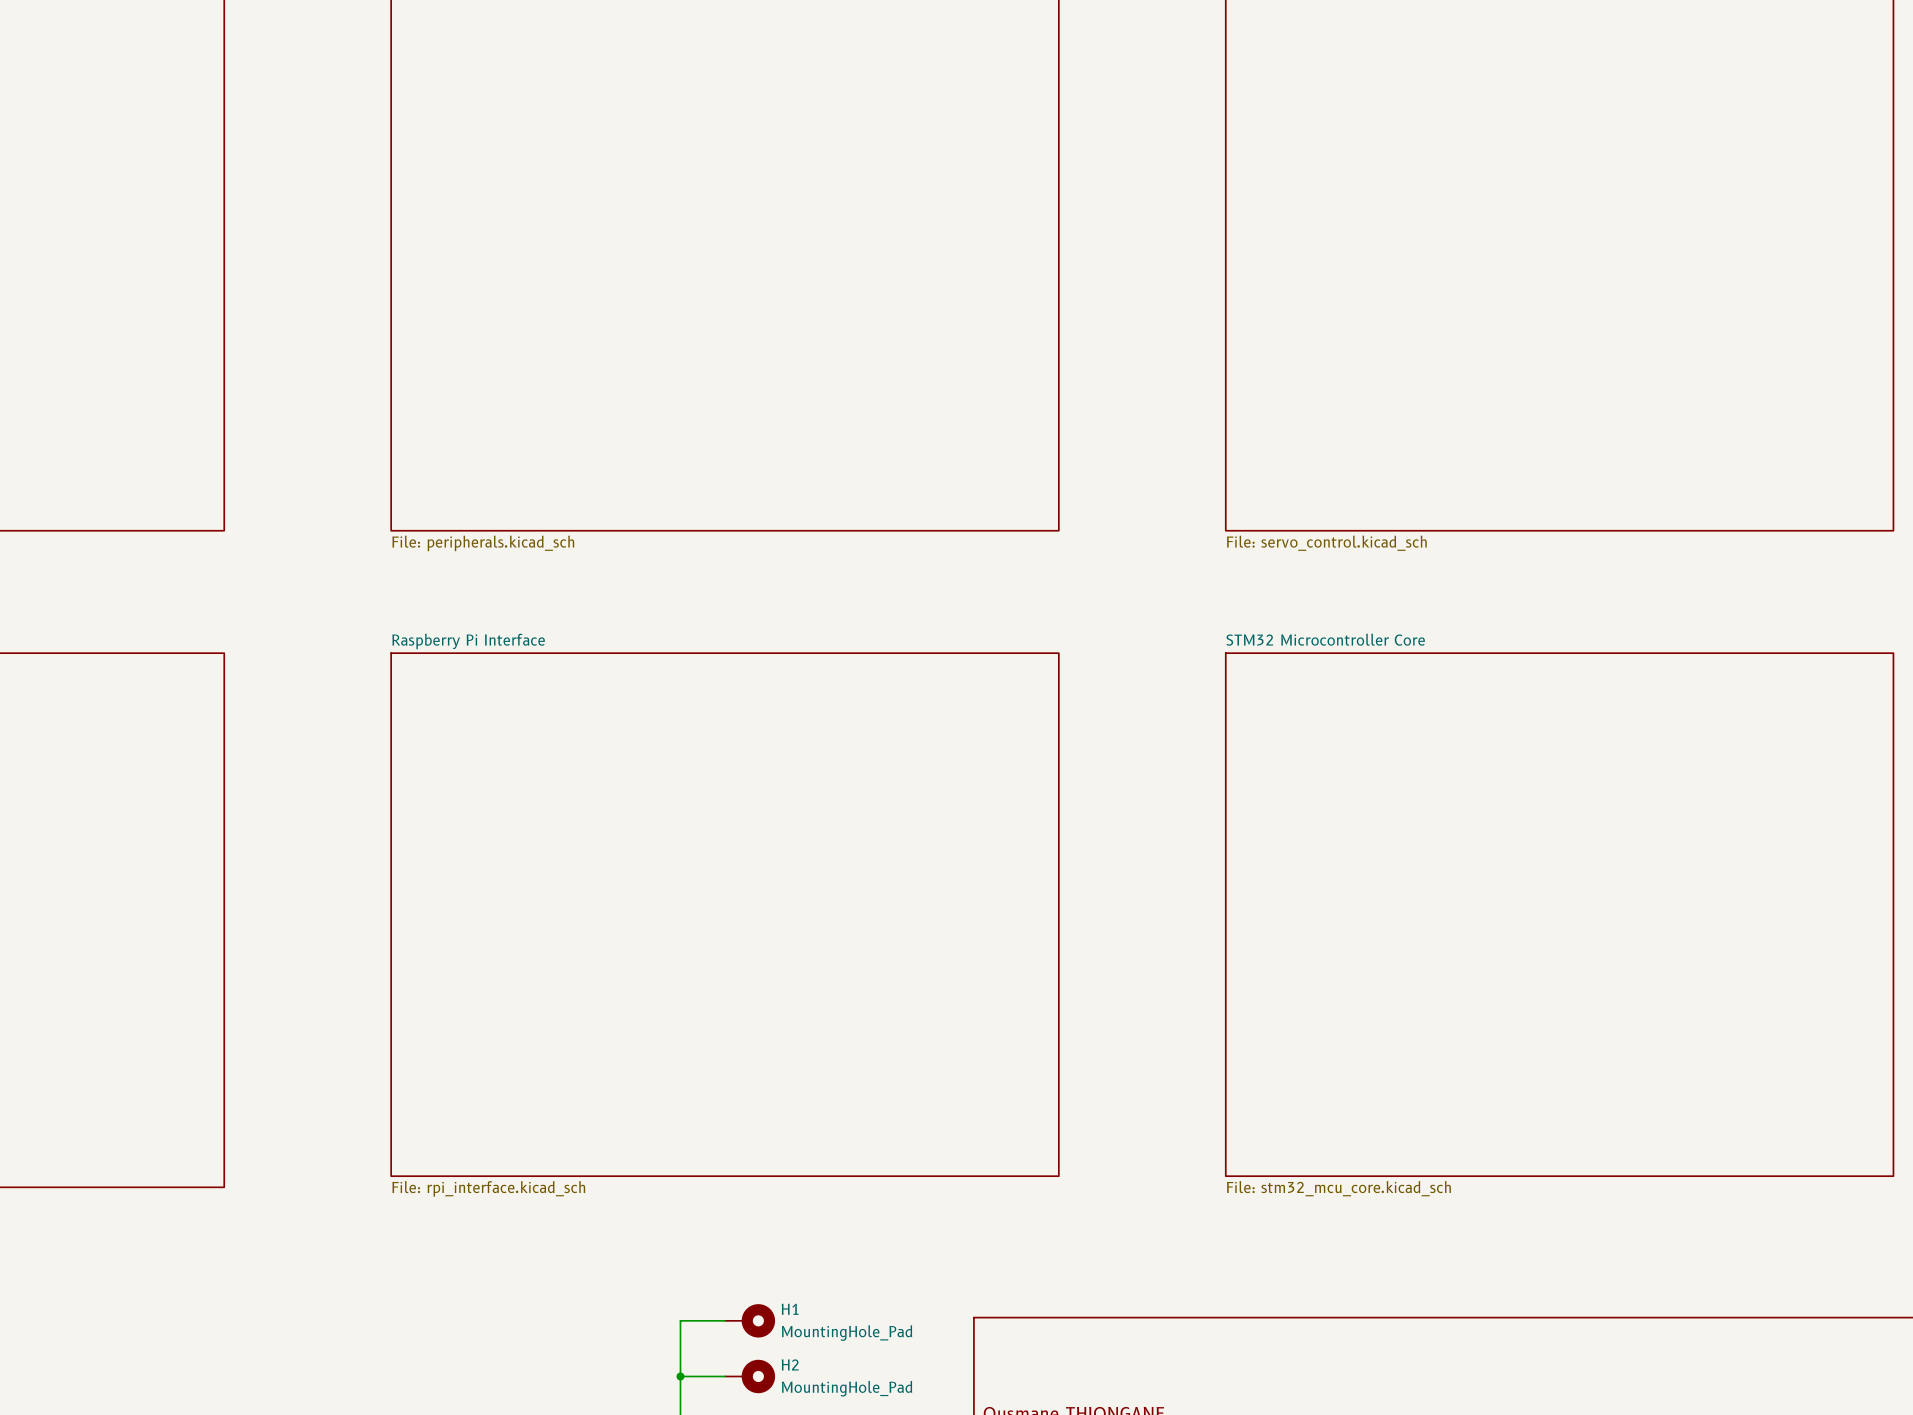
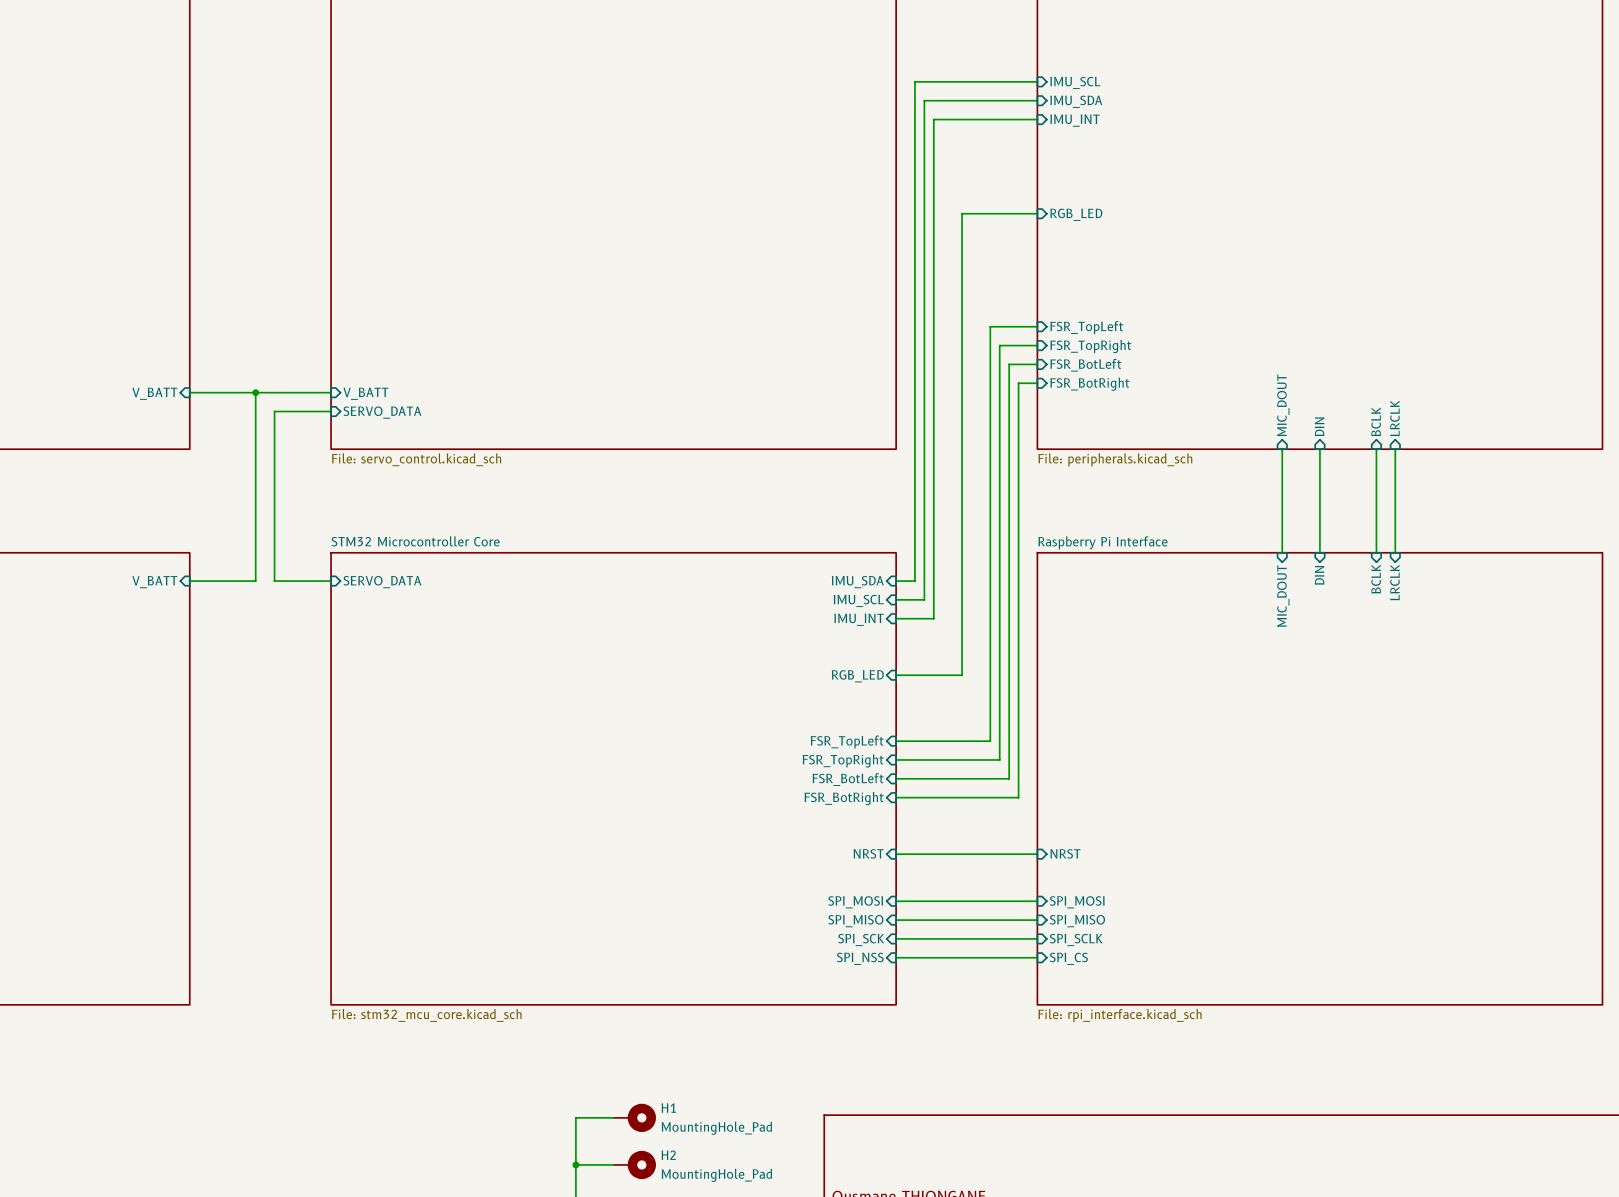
wire: none -> (1037, 81) (914, 81) (914, 581) (896, 581)
sheet pin: none -> IMU_SCL (1075, 82)
wire: none -> (1037, 100) (924, 100) (924, 599) (896, 599)
sheet pin: none -> IMU_SDA (1076, 101)
wire: none -> (1037, 119) (933, 119) (933, 618) (896, 618)
sheet pin: none -> IMU_INT (1074, 120)
wire: none -> (1037, 213) (962, 213) (962, 675) (896, 675)
sheet pin: none -> RGB_LED (1076, 214)
wire: none -> (1037, 326) (990, 326) (990, 741) (896, 741)
sheet pin: none -> FSR_TopLeft (1086, 327)
wire: none -> (1037, 345) (999, 345) (999, 759) (896, 759)
sheet pin: none -> FSR_TopRight (1090, 346)
wire: none -> (1037, 364) (1009, 364) (1009, 778) (896, 778)
sheet pin: none -> FSR_BotLeft (1085, 365)
wire: none -> (1037, 383) (1018, 383) (1018, 797) (896, 797)
sheet pin: none -> FSR_BotRight (1089, 384)
wire: none -> (189, 392) (331, 392)
wire: none -> (255, 392) (255, 581) (189, 581)
junction: none -> (255, 392)
sheet pin: none -> V_BATT (154, 393)
sheet pin: none -> V_BATT (365, 393)
sheet pin: none -> MIC_DOUT (1283, 405)
wire: none -> (331, 411) (274, 411) (274, 581) (331, 581)
sheet pin: none -> SERVO_DATA (382, 412)
sheet pin: none -> LRCLK (1394, 418)
sheet pin: none -> BCLK (1376, 421)
sheet pin: none -> DIN (1319, 426)
wire: none -> (1282, 449) (1282, 552)
wire: none -> (1319, 449) (1319, 552)
wire: none -> (1376, 449) (1376, 552)
wire: none -> (1395, 449) (1395, 552)
sheet value: File: peripherals.kicad_sch (483, 543) -> File: servo_control.kicad_sch (416, 459)
sheet value: File: servo_control.kicad_sch (1326, 543) -> File: peripherals.kicad_sch (1115, 459)
sheet STM32 Microcontroller Core shape: [1225, 652, 1895, 1177] -> [330, 552, 897, 1006]
sheet pin: none -> DIN (1319, 575)
sheet pin: none -> BCLK (1376, 579)
sheet pin: none -> V_BATT (154, 582)
sheet pin: none -> SERVO_DATA (382, 582)
sheet pin: none -> IMU_SDA (857, 582)
sheet pin: none -> LRCLK (1394, 582)
sheet pin: none -> MIC_DOUT (1283, 596)
sheet pin: none -> IMU_SCL (858, 600)
sheet pin: none -> IMU_INT (858, 619)
sheet pin: none -> RGB_LED (857, 676)
sheet pin: none -> FSR_TopLeft (847, 742)
sheet pin: none -> FSR_TopRight (843, 760)
sheet Raspberry Pi Interface: File: rpi_interface.kicad_sch (725, 914) -> none
sheet Raspberry Pi Interface: none -> File: rpi_interface.kicad_sch (1319, 778)
sheet pin: none -> FSR_BotLeft (848, 779)
sheet pin: none -> FSR_BotRight (844, 798)
sheet pin: none -> NRST (868, 853)
sheet pin: none -> NRST (1065, 853)
wire: none -> (896, 854) (1037, 854)
wire: none -> (896, 901) (1037, 901)
sheet pin: none -> SPI_MOSI (855, 902)
sheet pin: none -> SPI_MOSI (1077, 902)
wire: none -> (896, 920) (1037, 920)
sheet pin: none -> SPI_MISO (855, 921)
sheet pin: none -> SPI_MISO (1077, 921)
wire: none -> (896, 938) (1037, 938)
sheet pin: none -> SPI_SCK (861, 939)
sheet pin: none -> SPI_SCLK (1076, 939)
wire: none -> (896, 957) (1037, 957)
sheet pin: none -> SPI_NSS (860, 958)
sheet pin: none -> SPI_CS (1068, 958)

